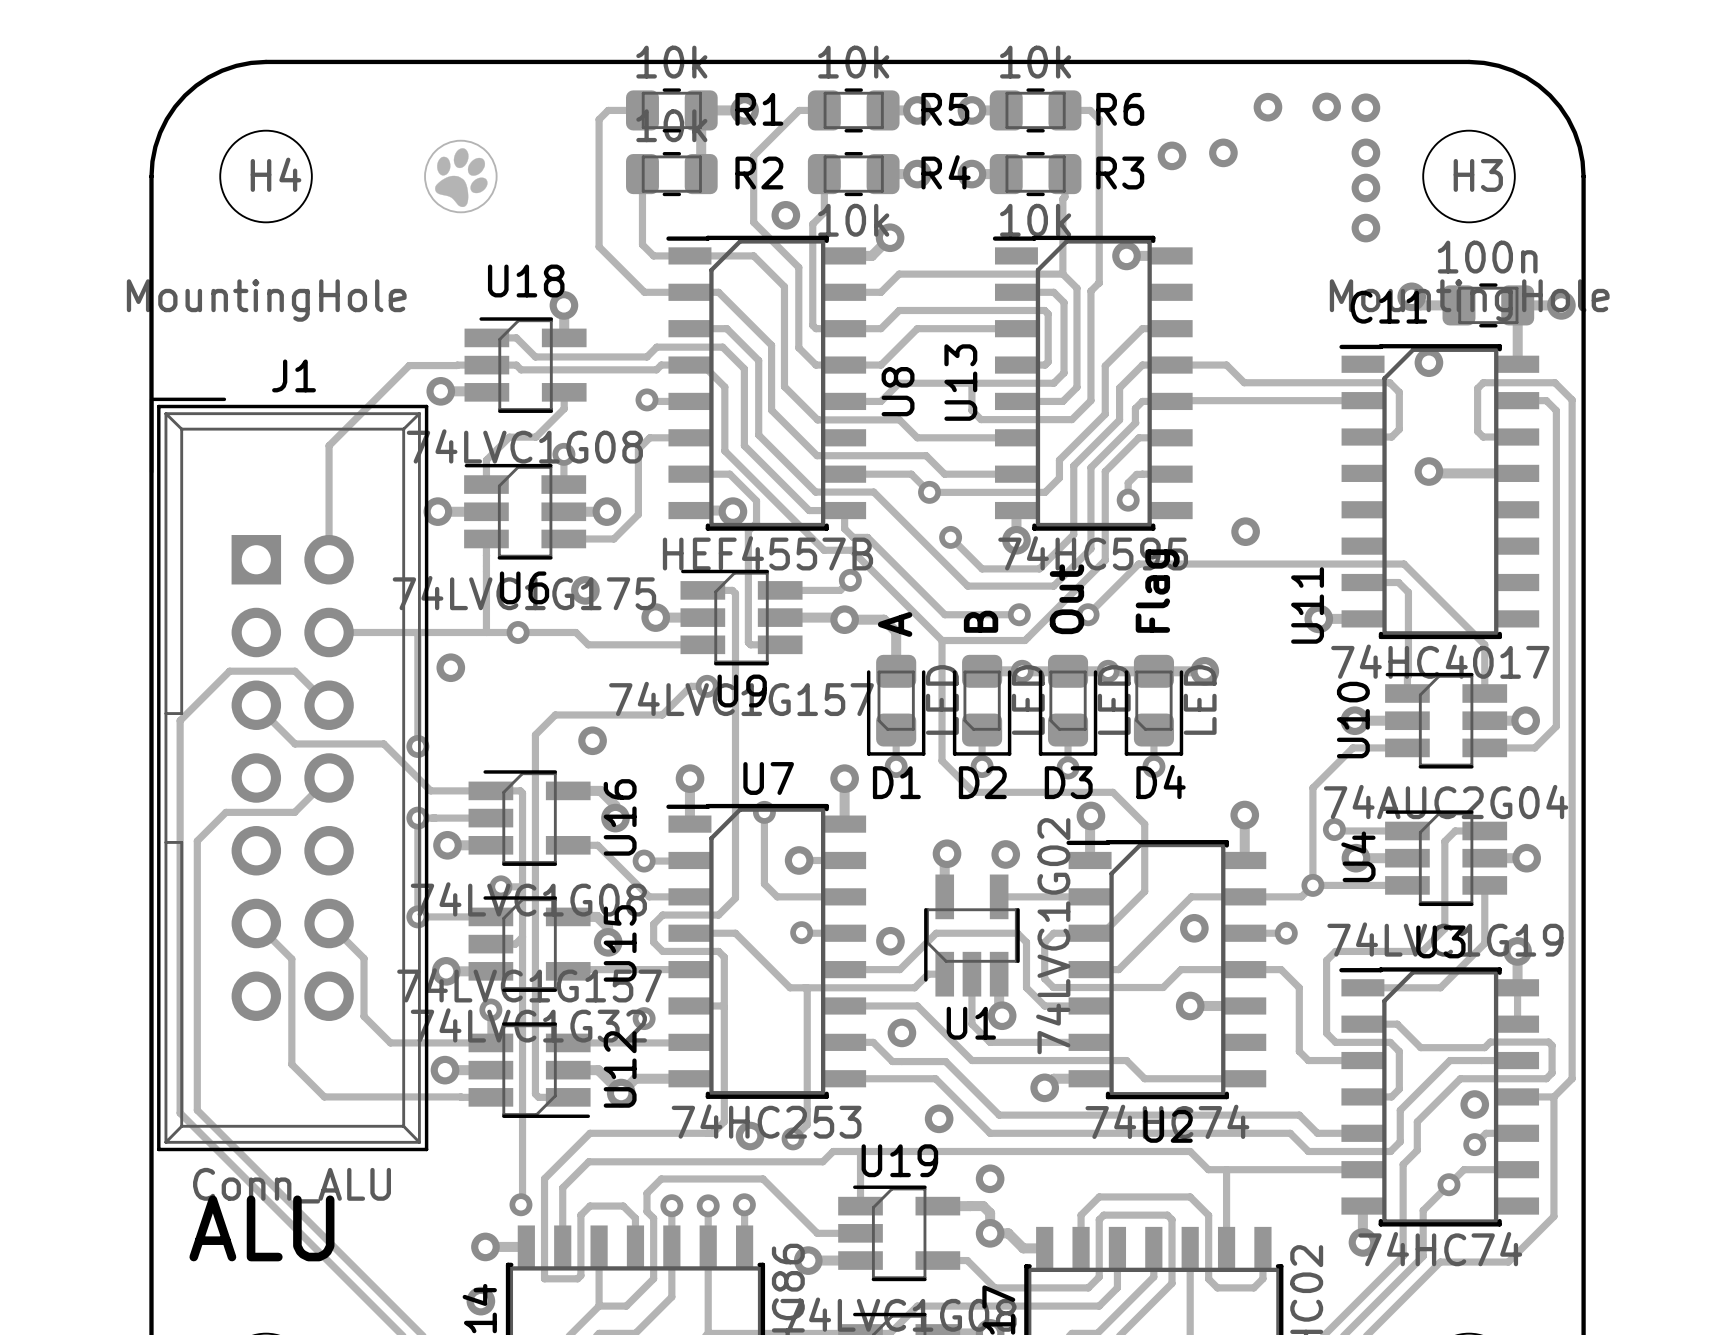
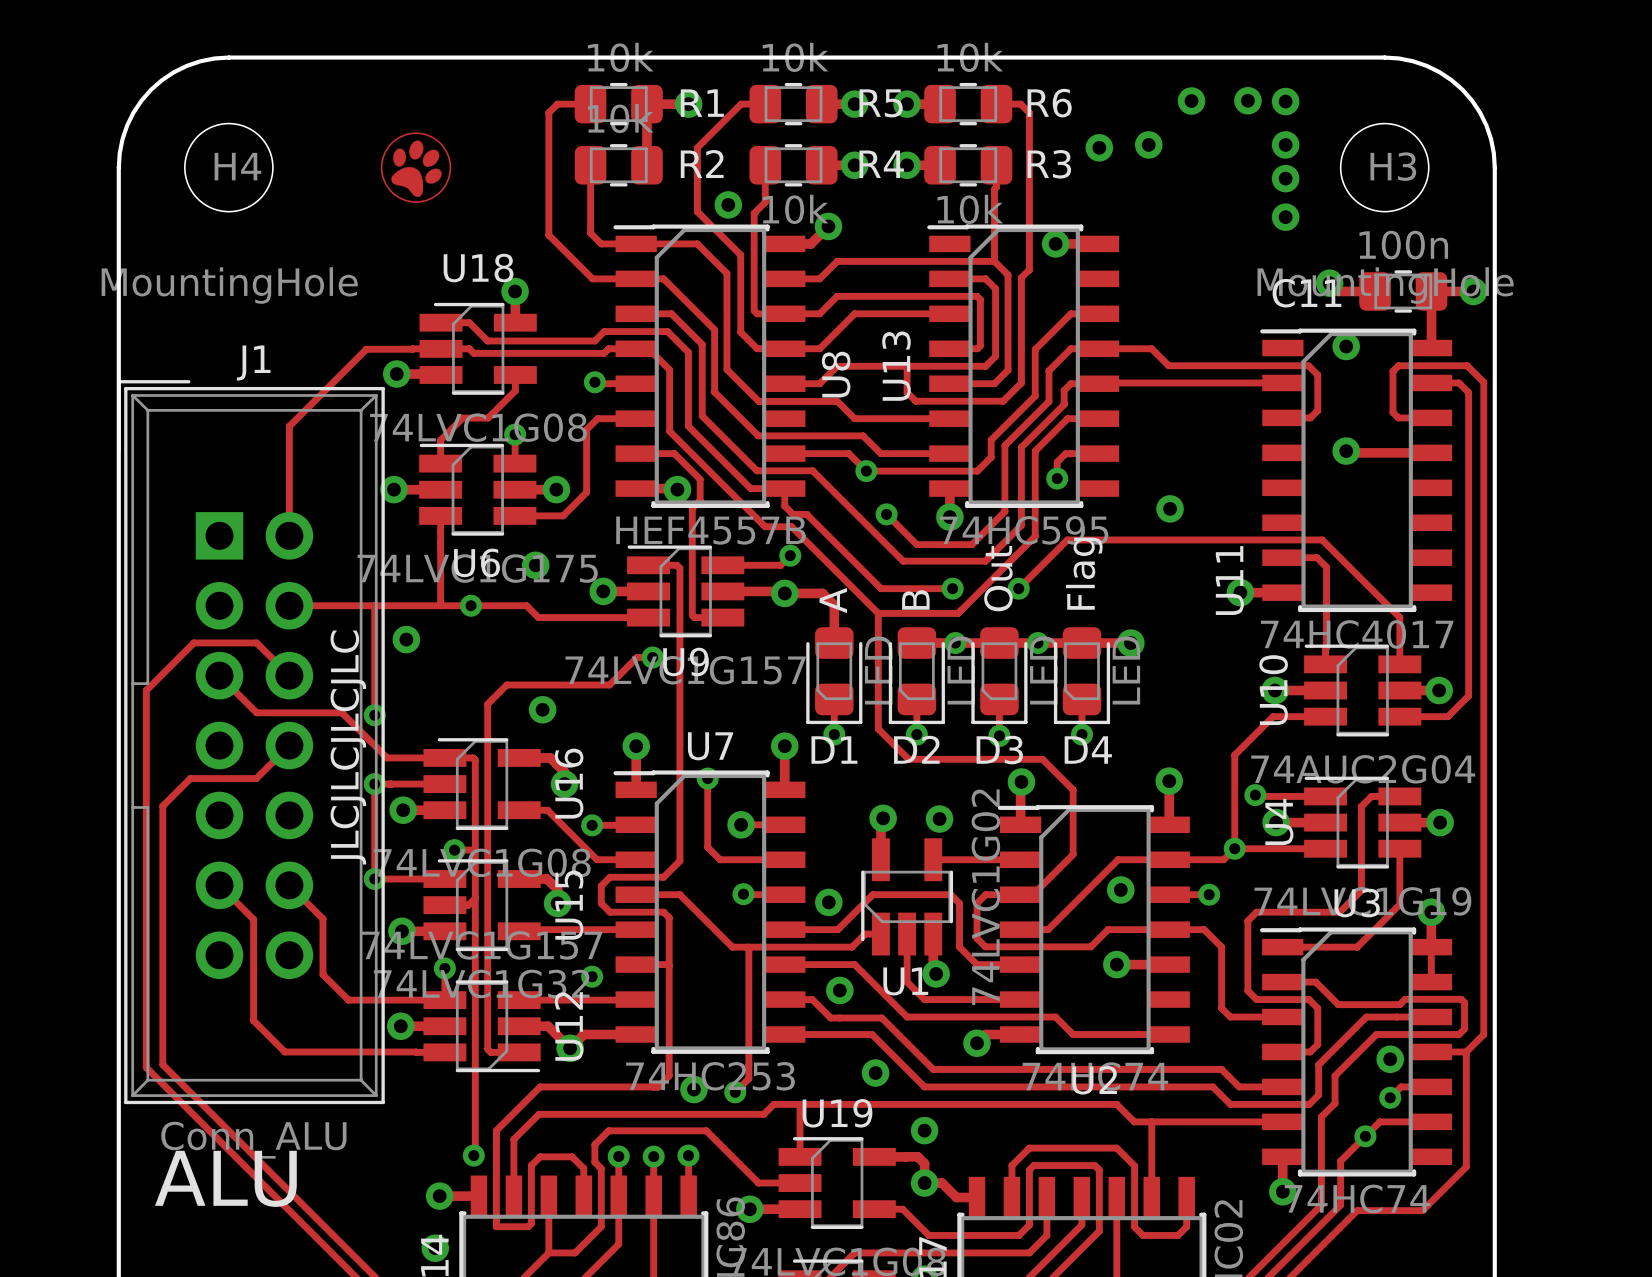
text: none -> JLCJLCJLCJLC (348, 747)

